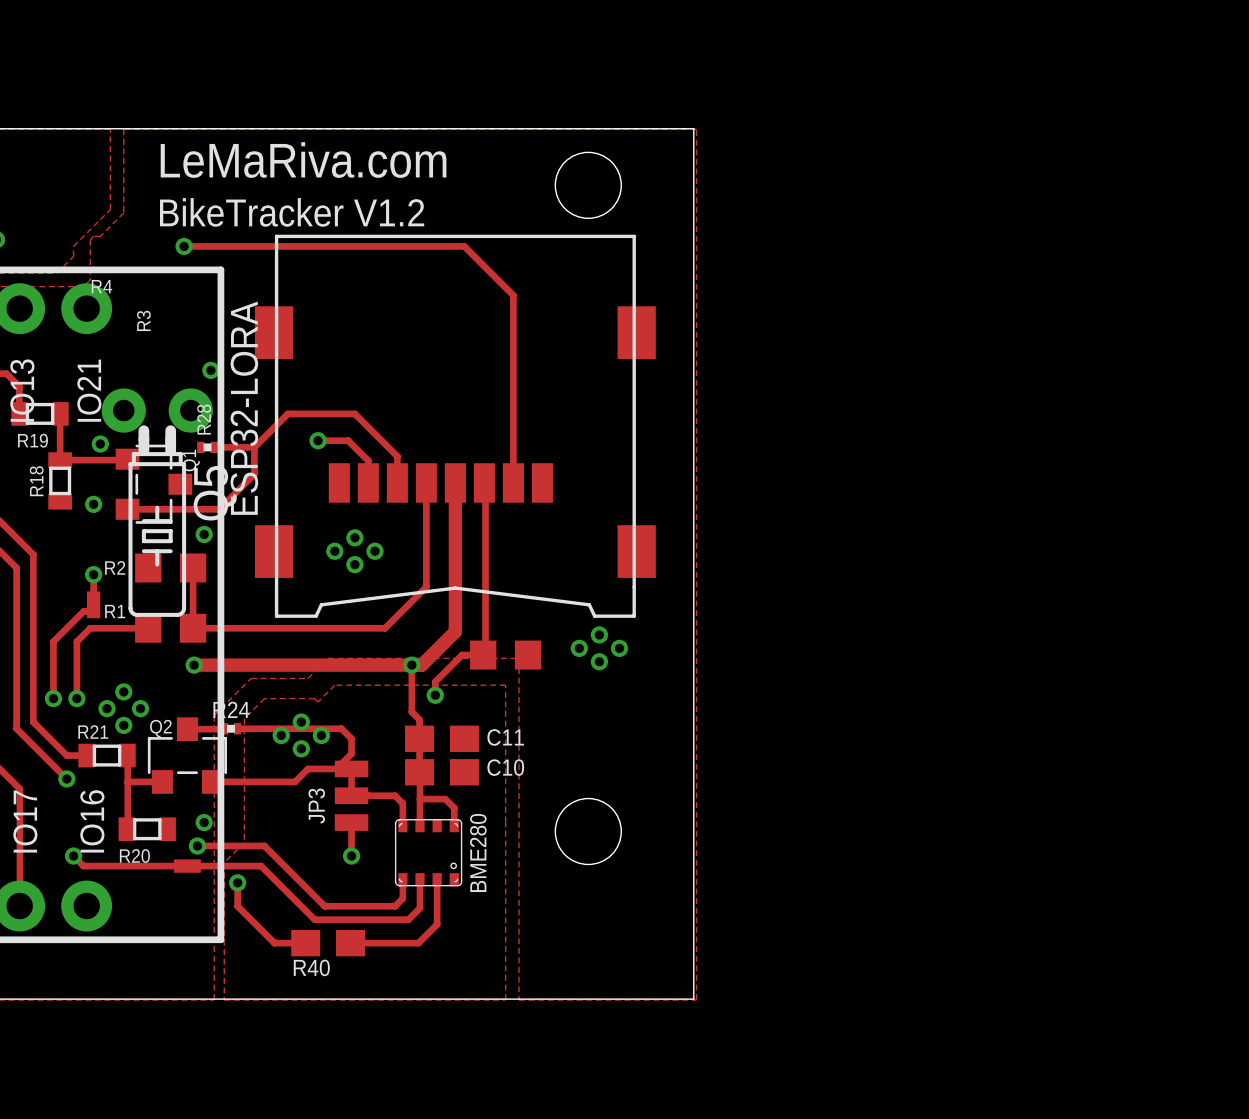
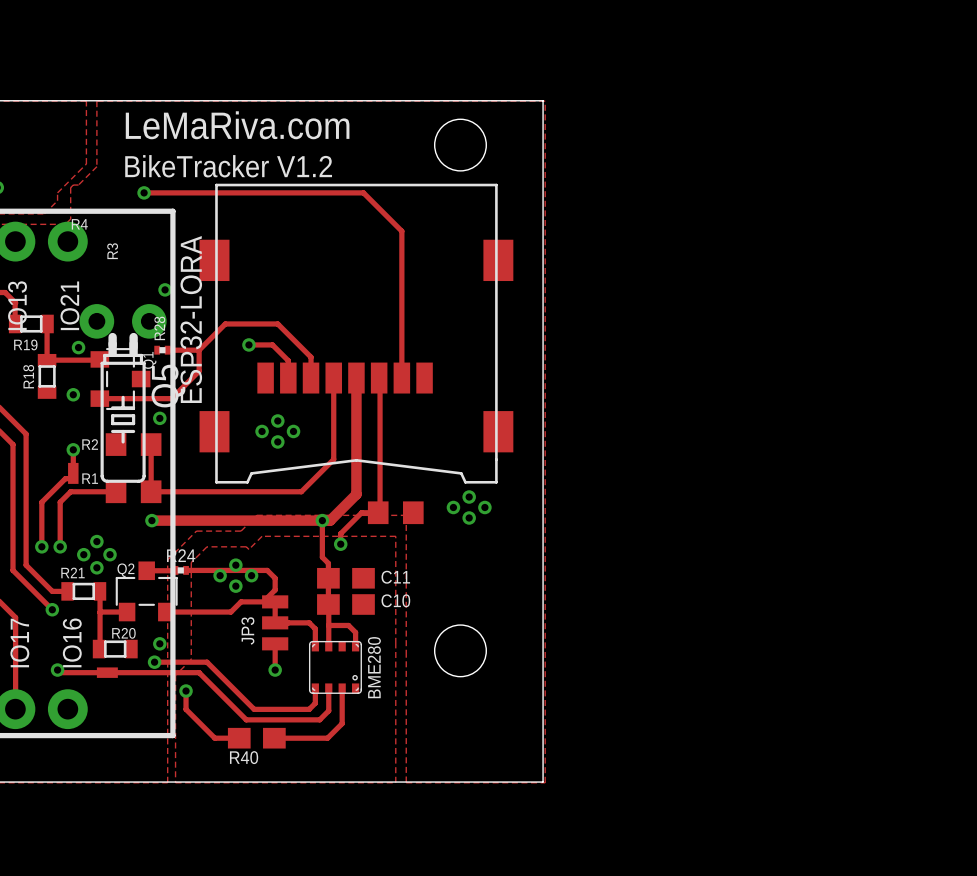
track: (73, 856) (83, 866) (180, 866) -> none
R20 name position: R20 (134, 856) -> R20 (123, 633)
track: none -> (60, 672) (102, 672)
part position: (187, 866) -> (107, 672)
track: (194, 866) (261, 866) -> (112, 672) (199, 672) (204, 677)

